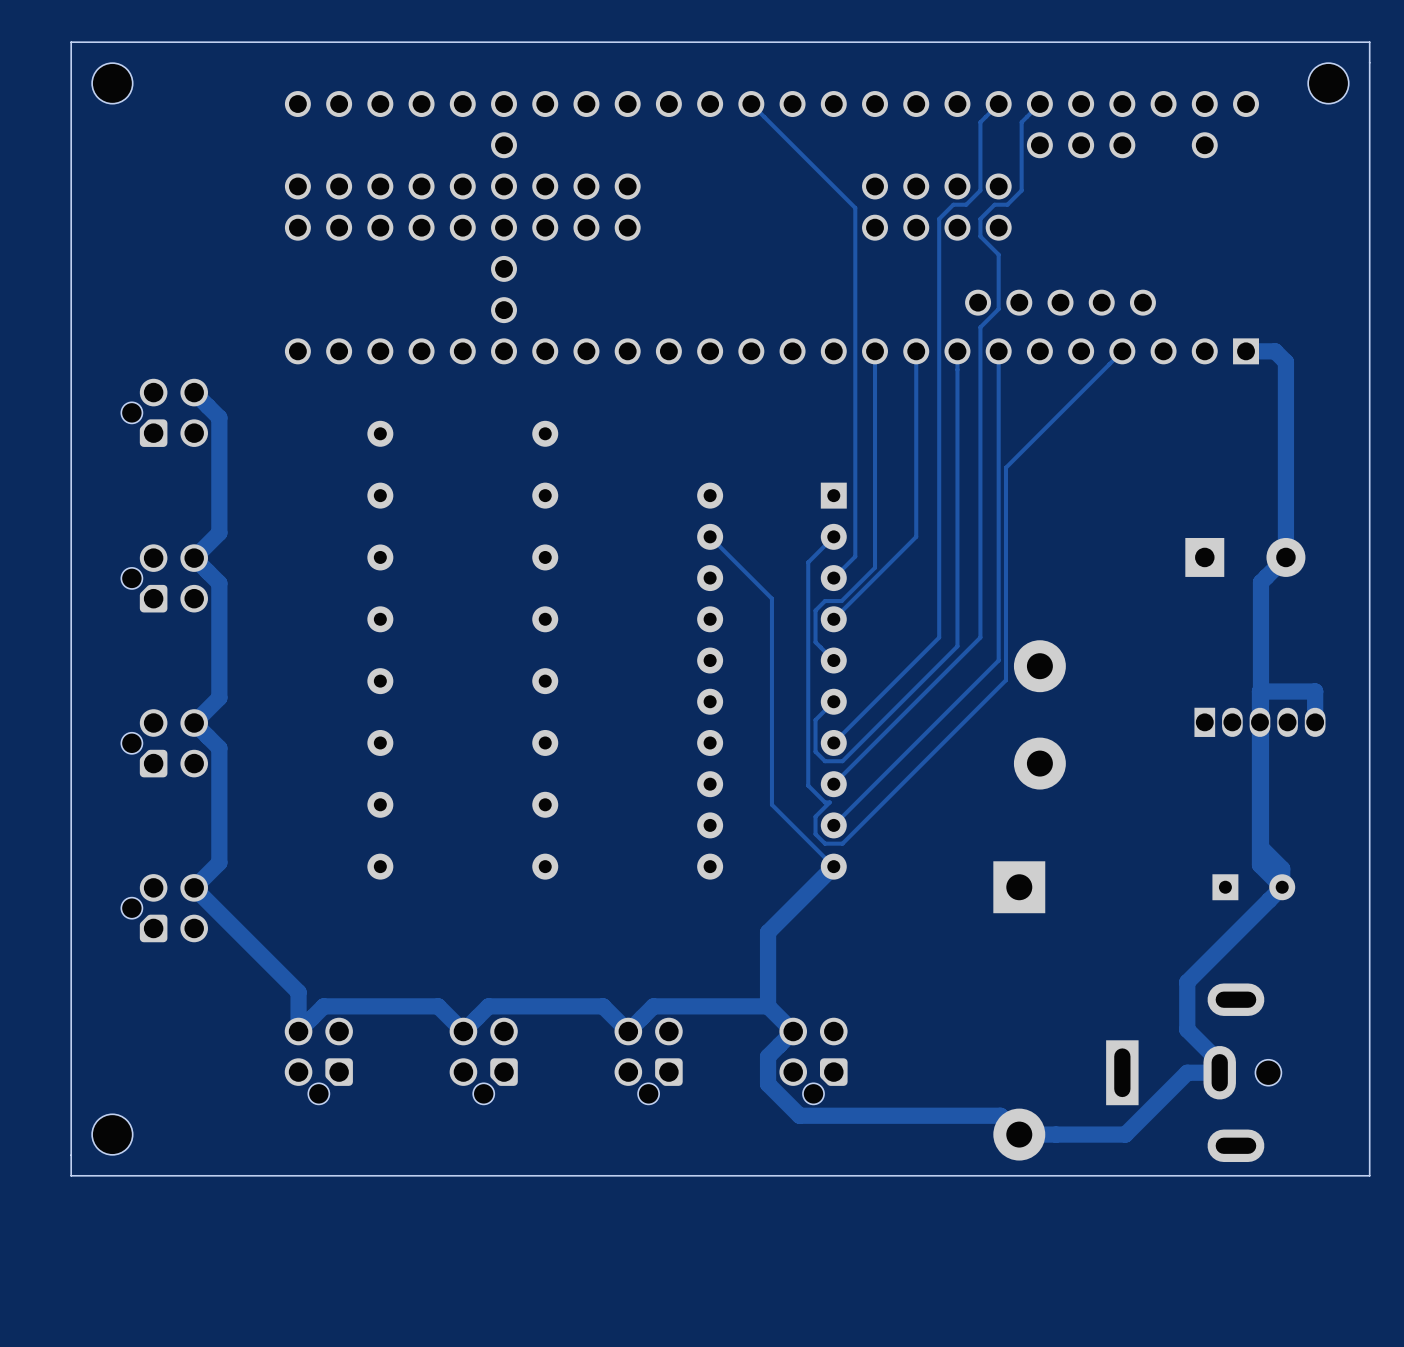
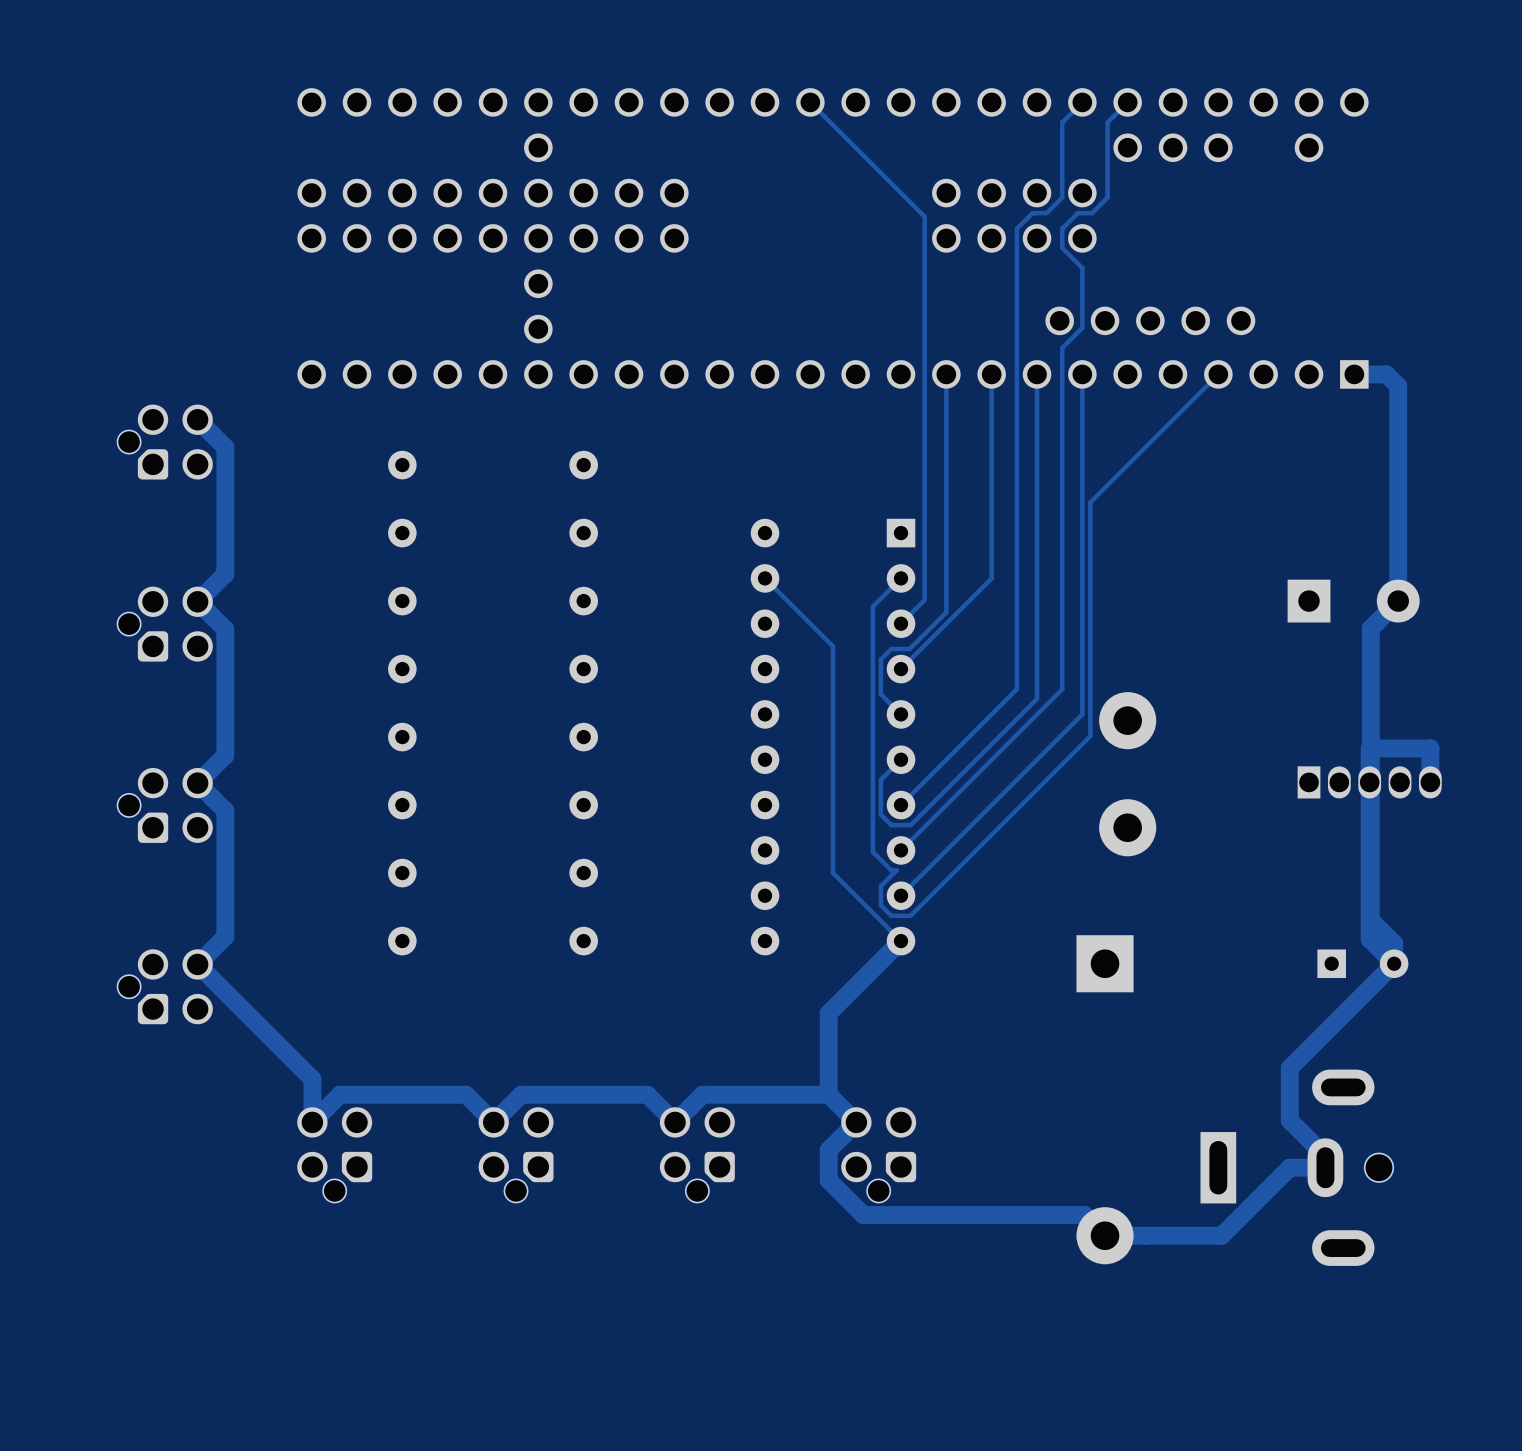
board edge: (1369, 42) (71, 42) (71, 1175) (1369, 1175) (1369, 42) -> none
part: (112, 83) -> none
part: (1328, 83) -> none
part: (112, 1134) -> none

